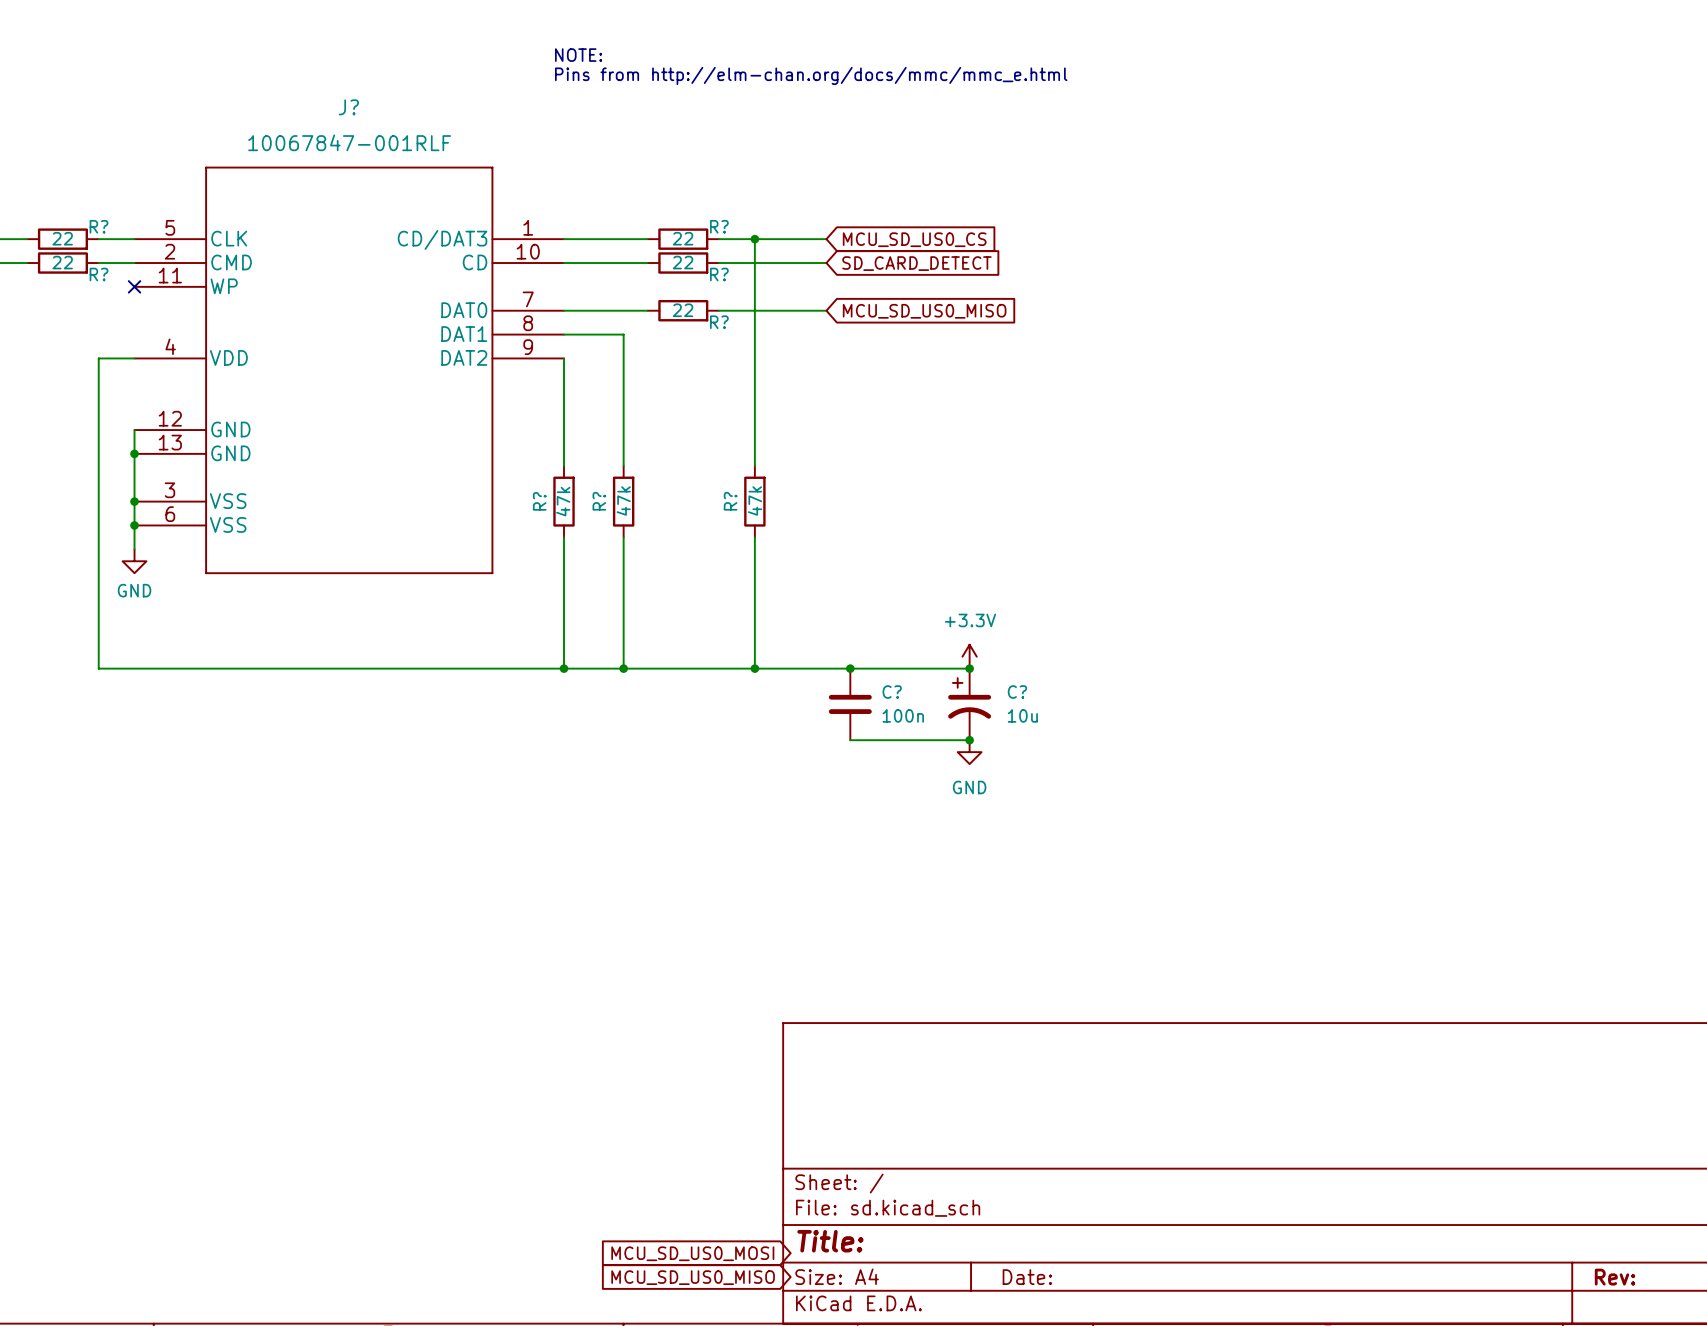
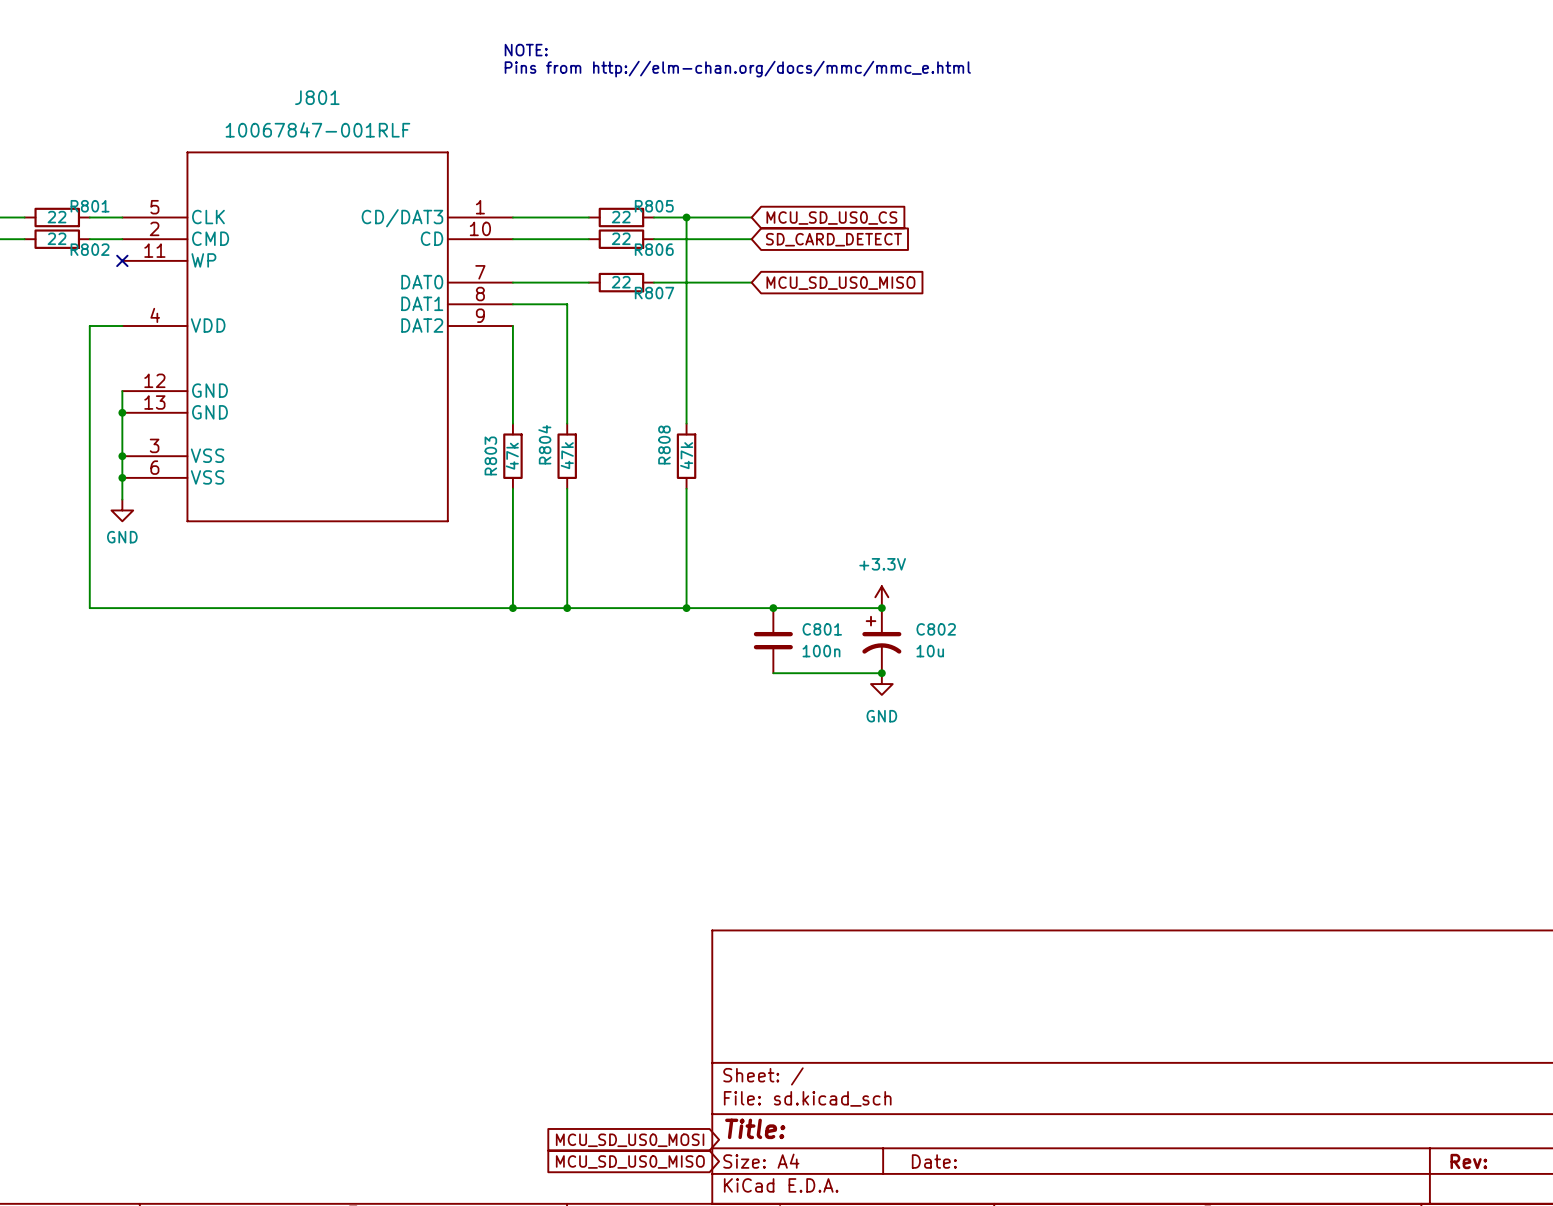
J? name: J? (348, 107) -> J801 (317, 97)
R? name: R? (99, 226) -> R801 (90, 206)
R? name: R? (719, 226) -> R805 (654, 206)
R? name: R? (99, 274) -> R802 (90, 249)
R? name: R? (719, 274) -> R806 (654, 249)
R? name: R? (719, 322) -> R807 (654, 293)
R? name: R? (539, 501) -> R803 (490, 455)
R? name: R? (599, 501) -> R804 (544, 444)
R? name: R? (730, 501) -> R808 (664, 445)
C? name: C? (892, 692) -> C801 (822, 629)
C? name: C? (1017, 692) -> C802 (936, 629)

